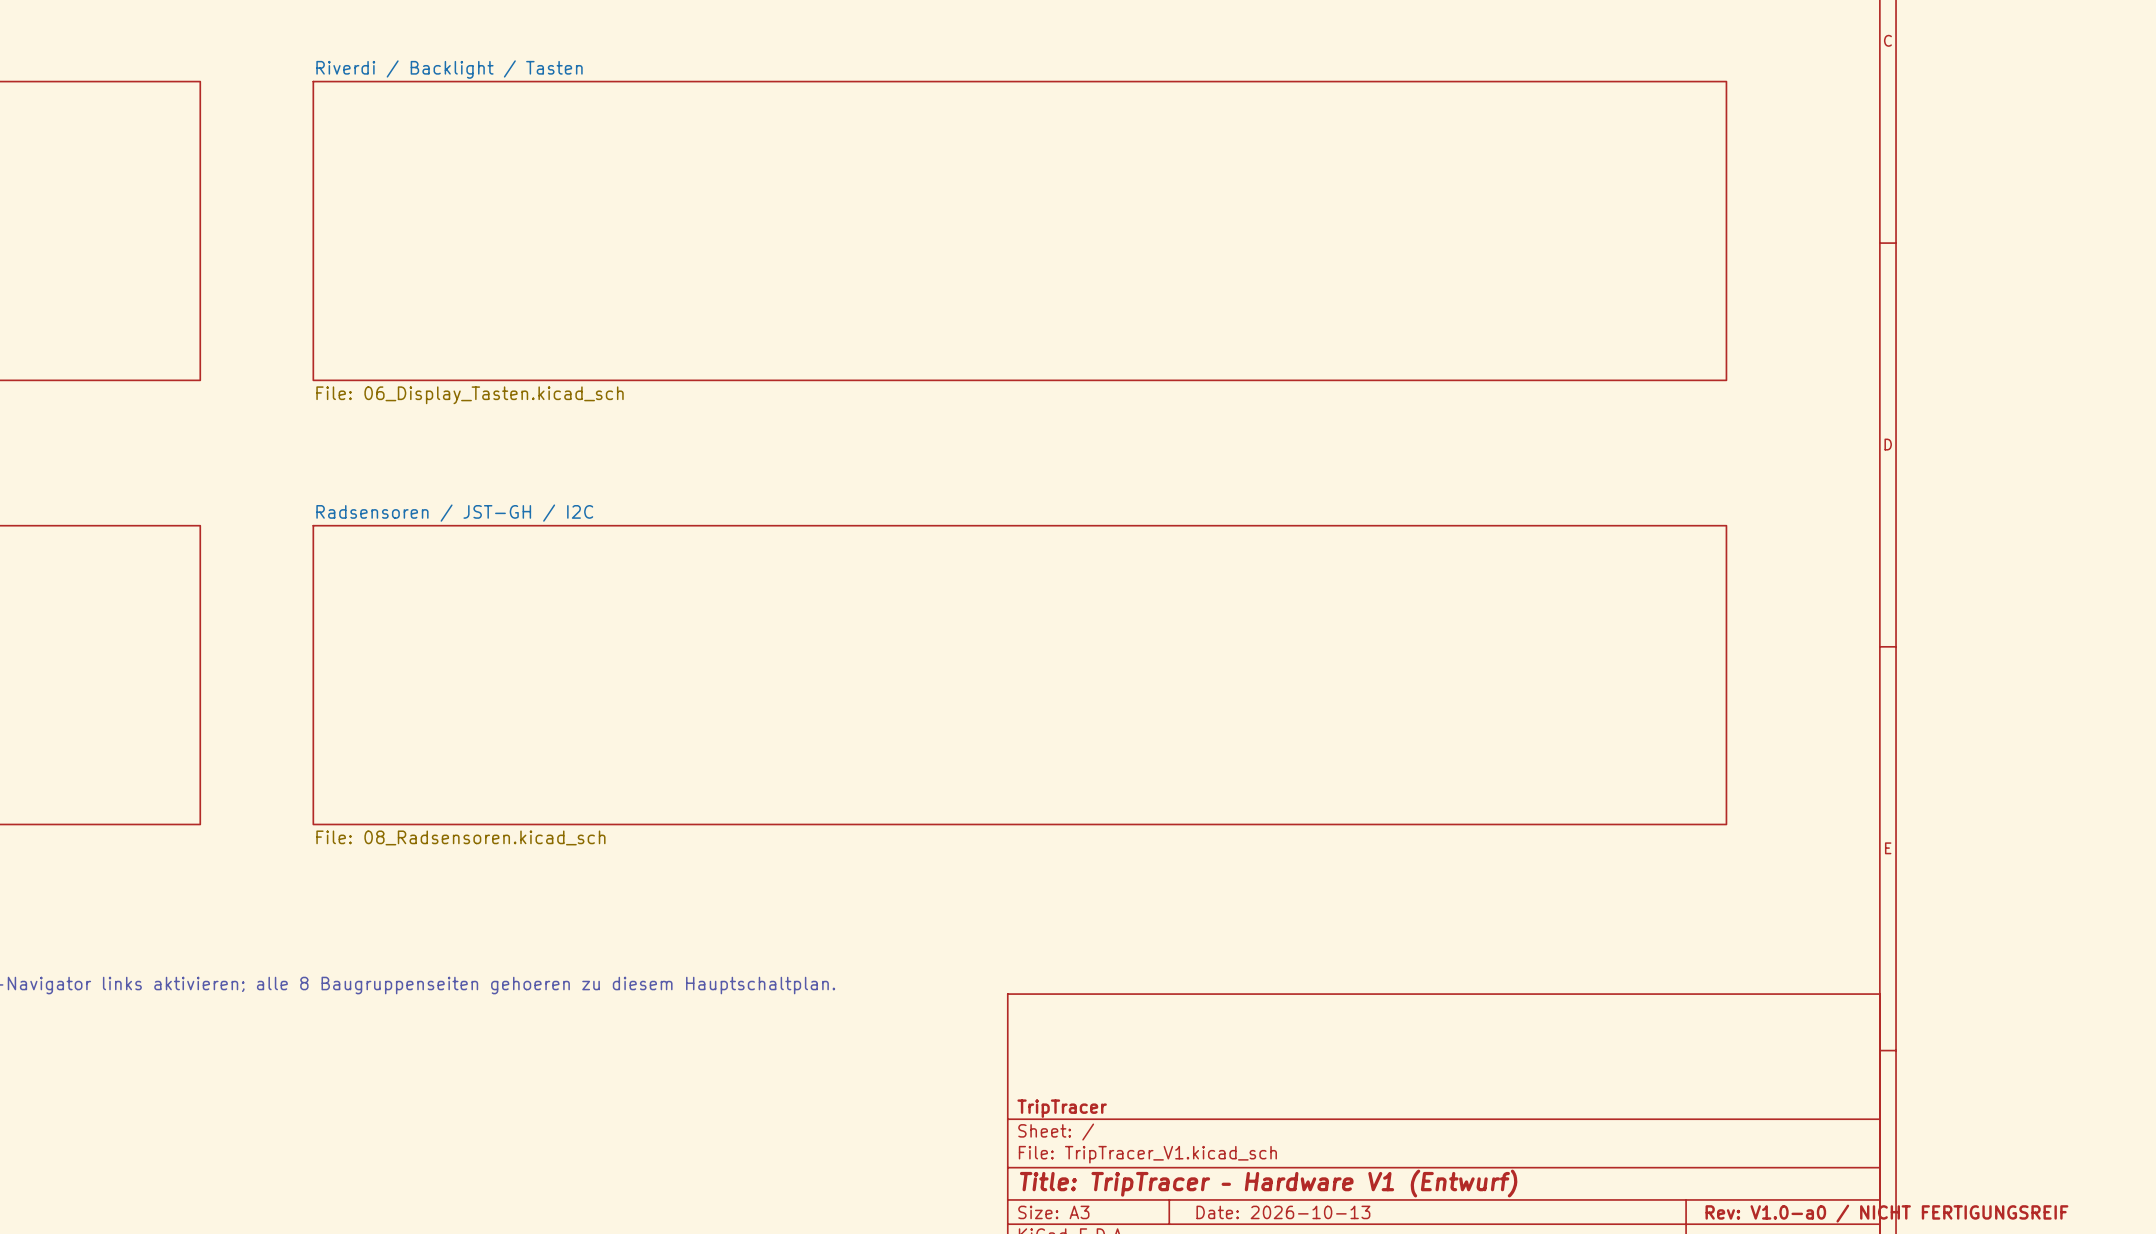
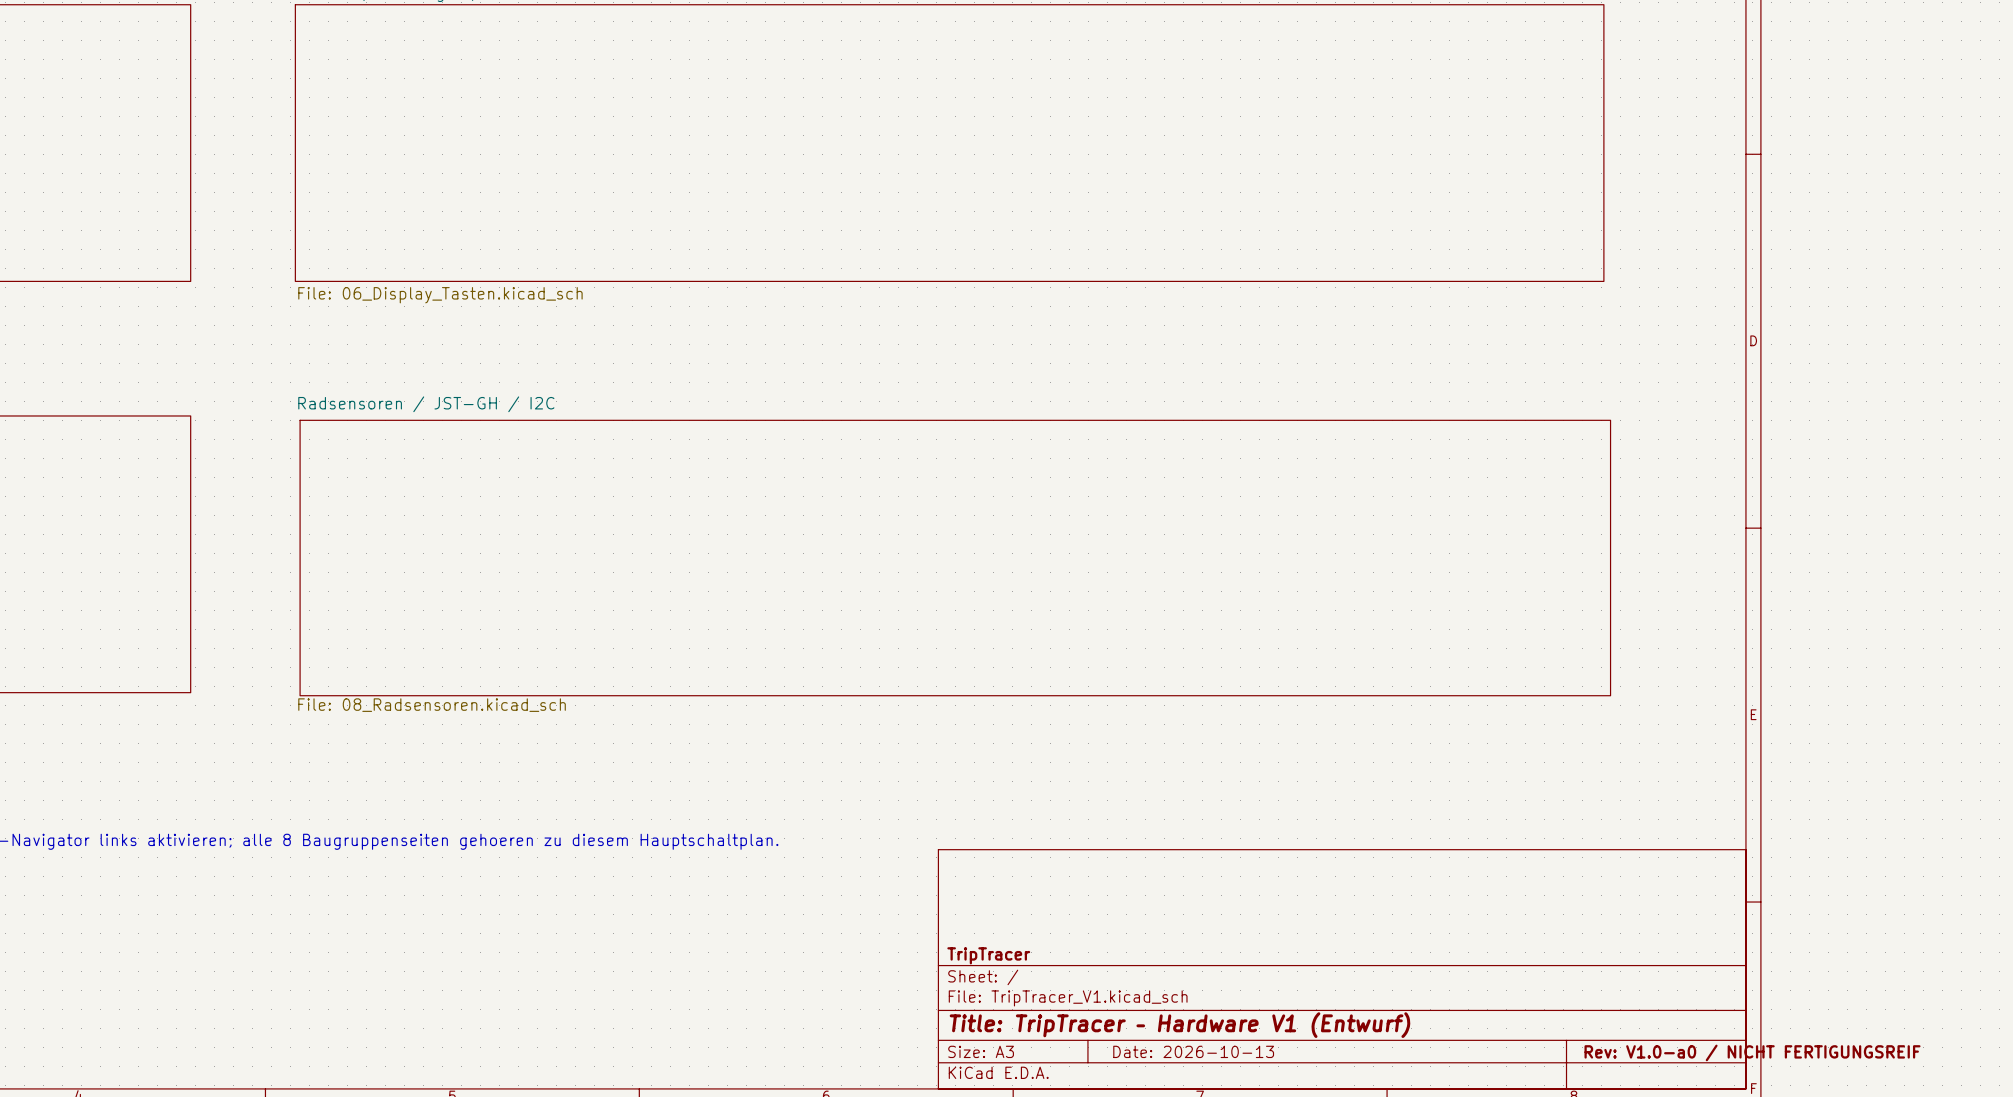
sheet Radsensoren / JST-GH / I2C shape: [313, 525, 1727, 825] -> [300, 420, 1611, 696]

